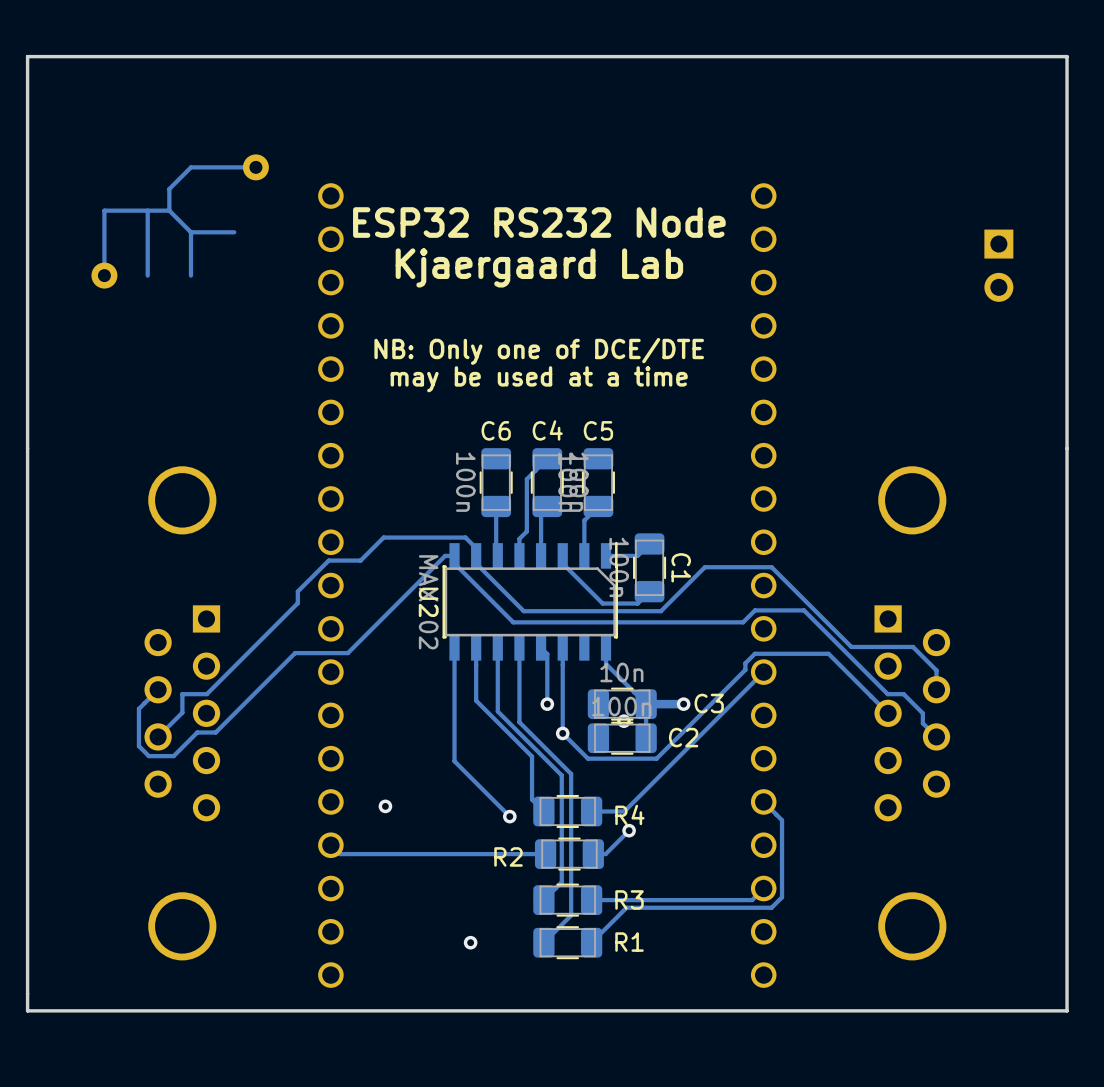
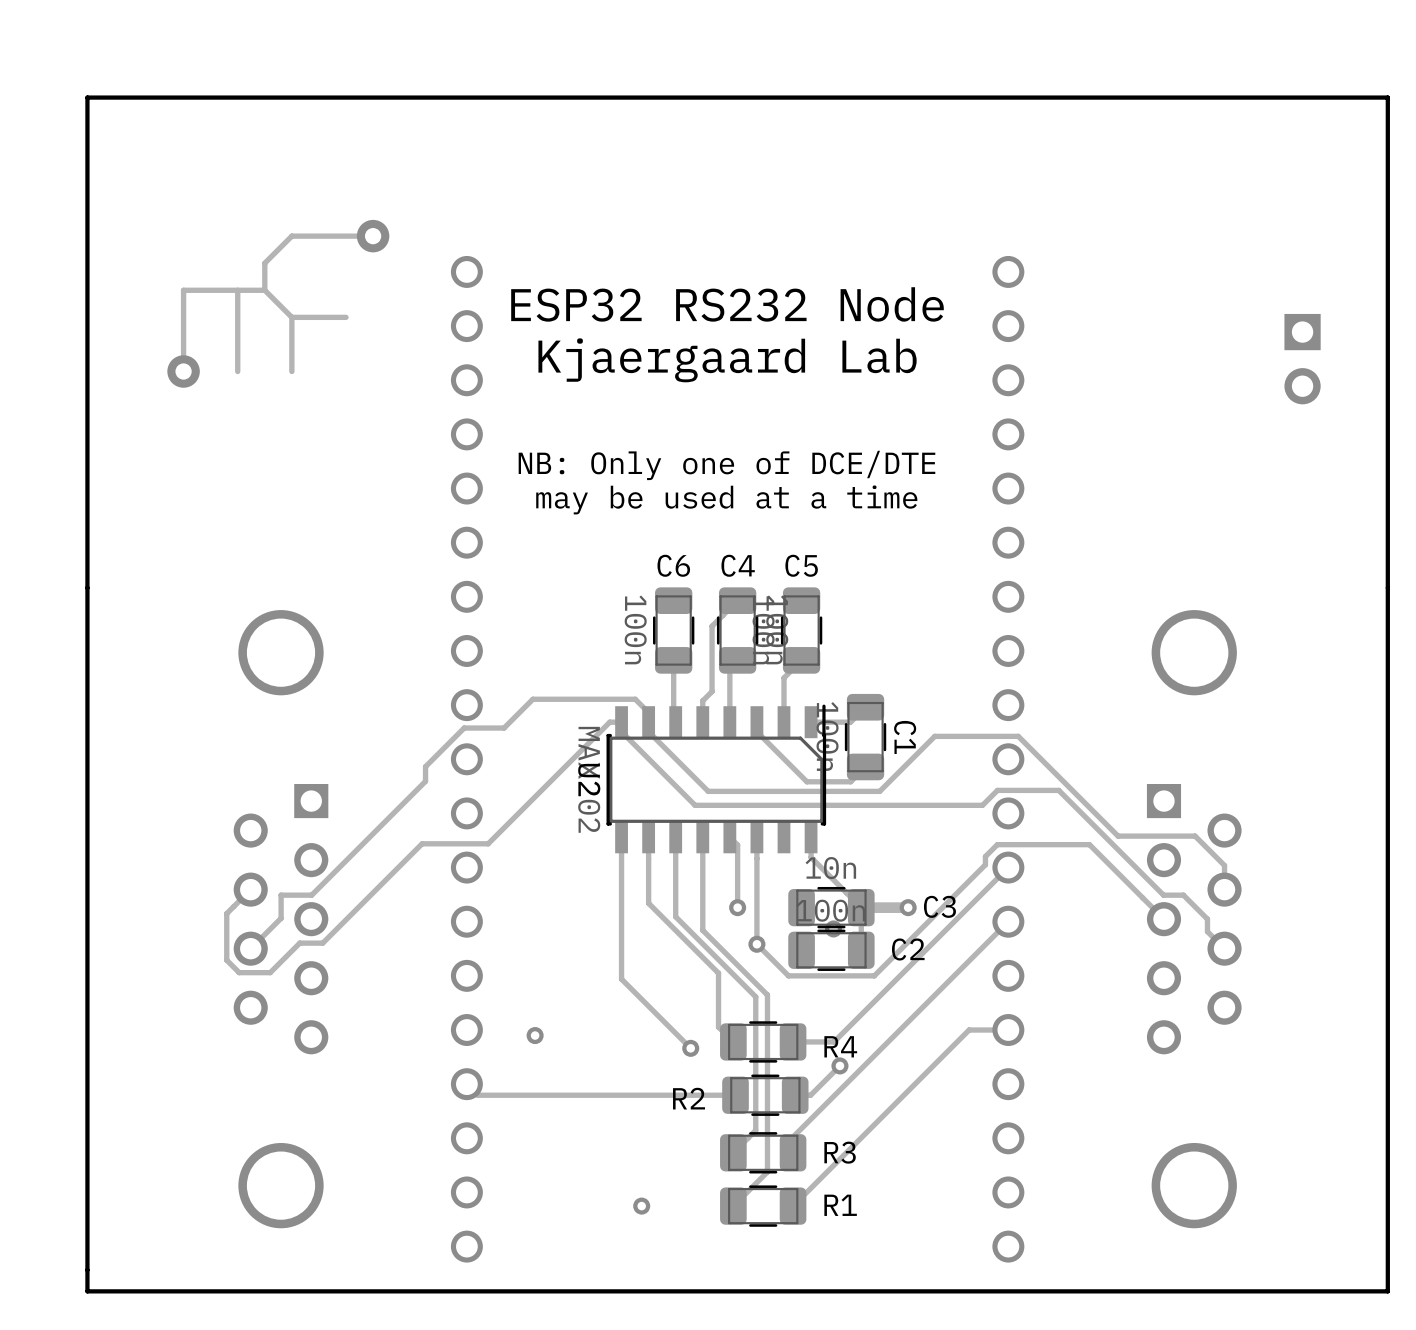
track: none -> (1008, 921) (793, 1137)
track: (763, 801) (782, 820) (782, 897) (771, 907) (626, 907) -> (1008, 1030) (969, 1030) (836, 1162)
track: (763, 888) (752, 900) (591, 900) -> none

